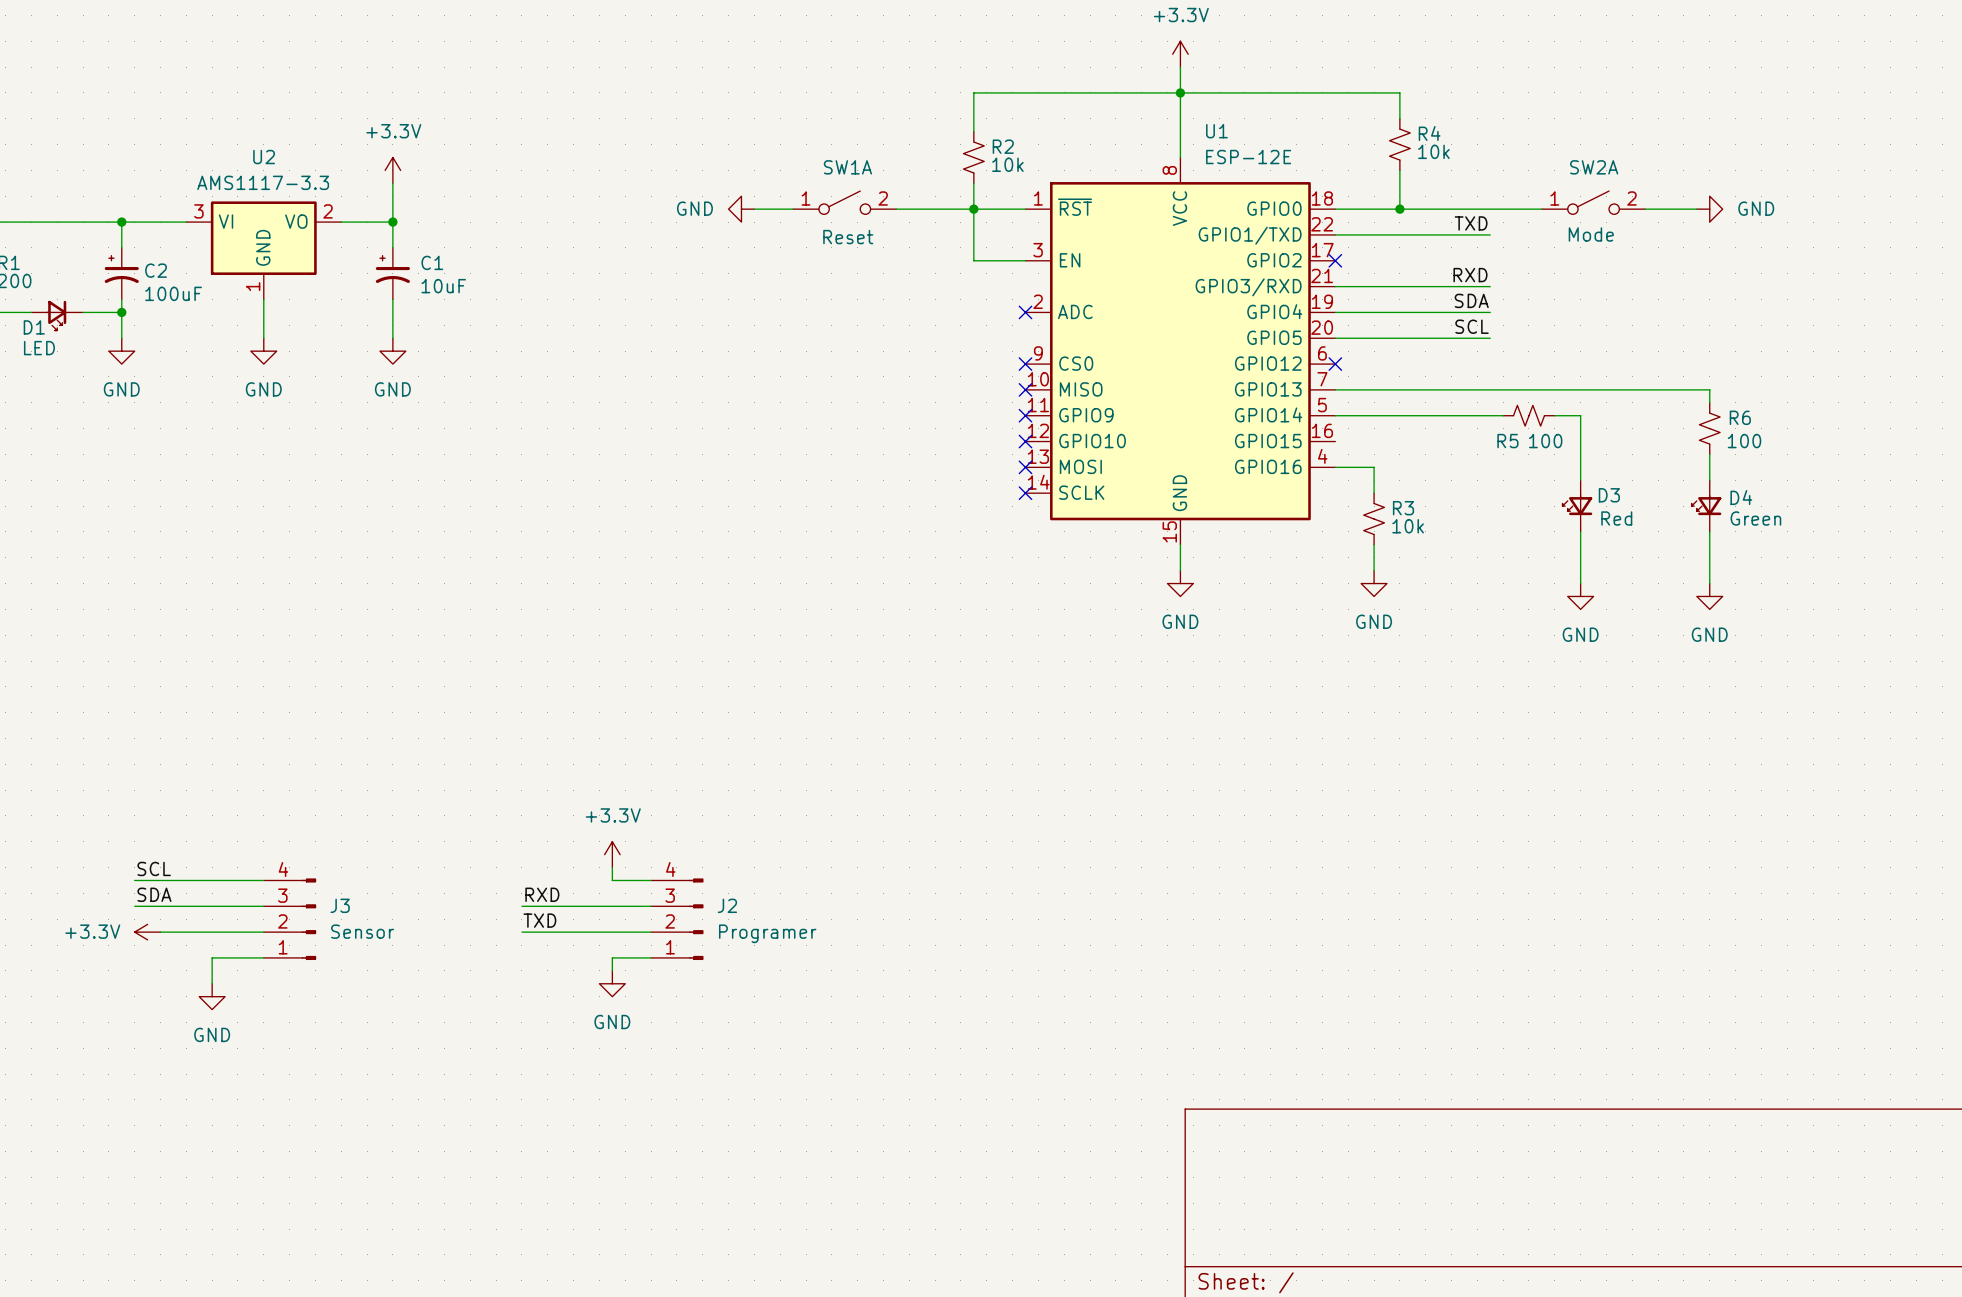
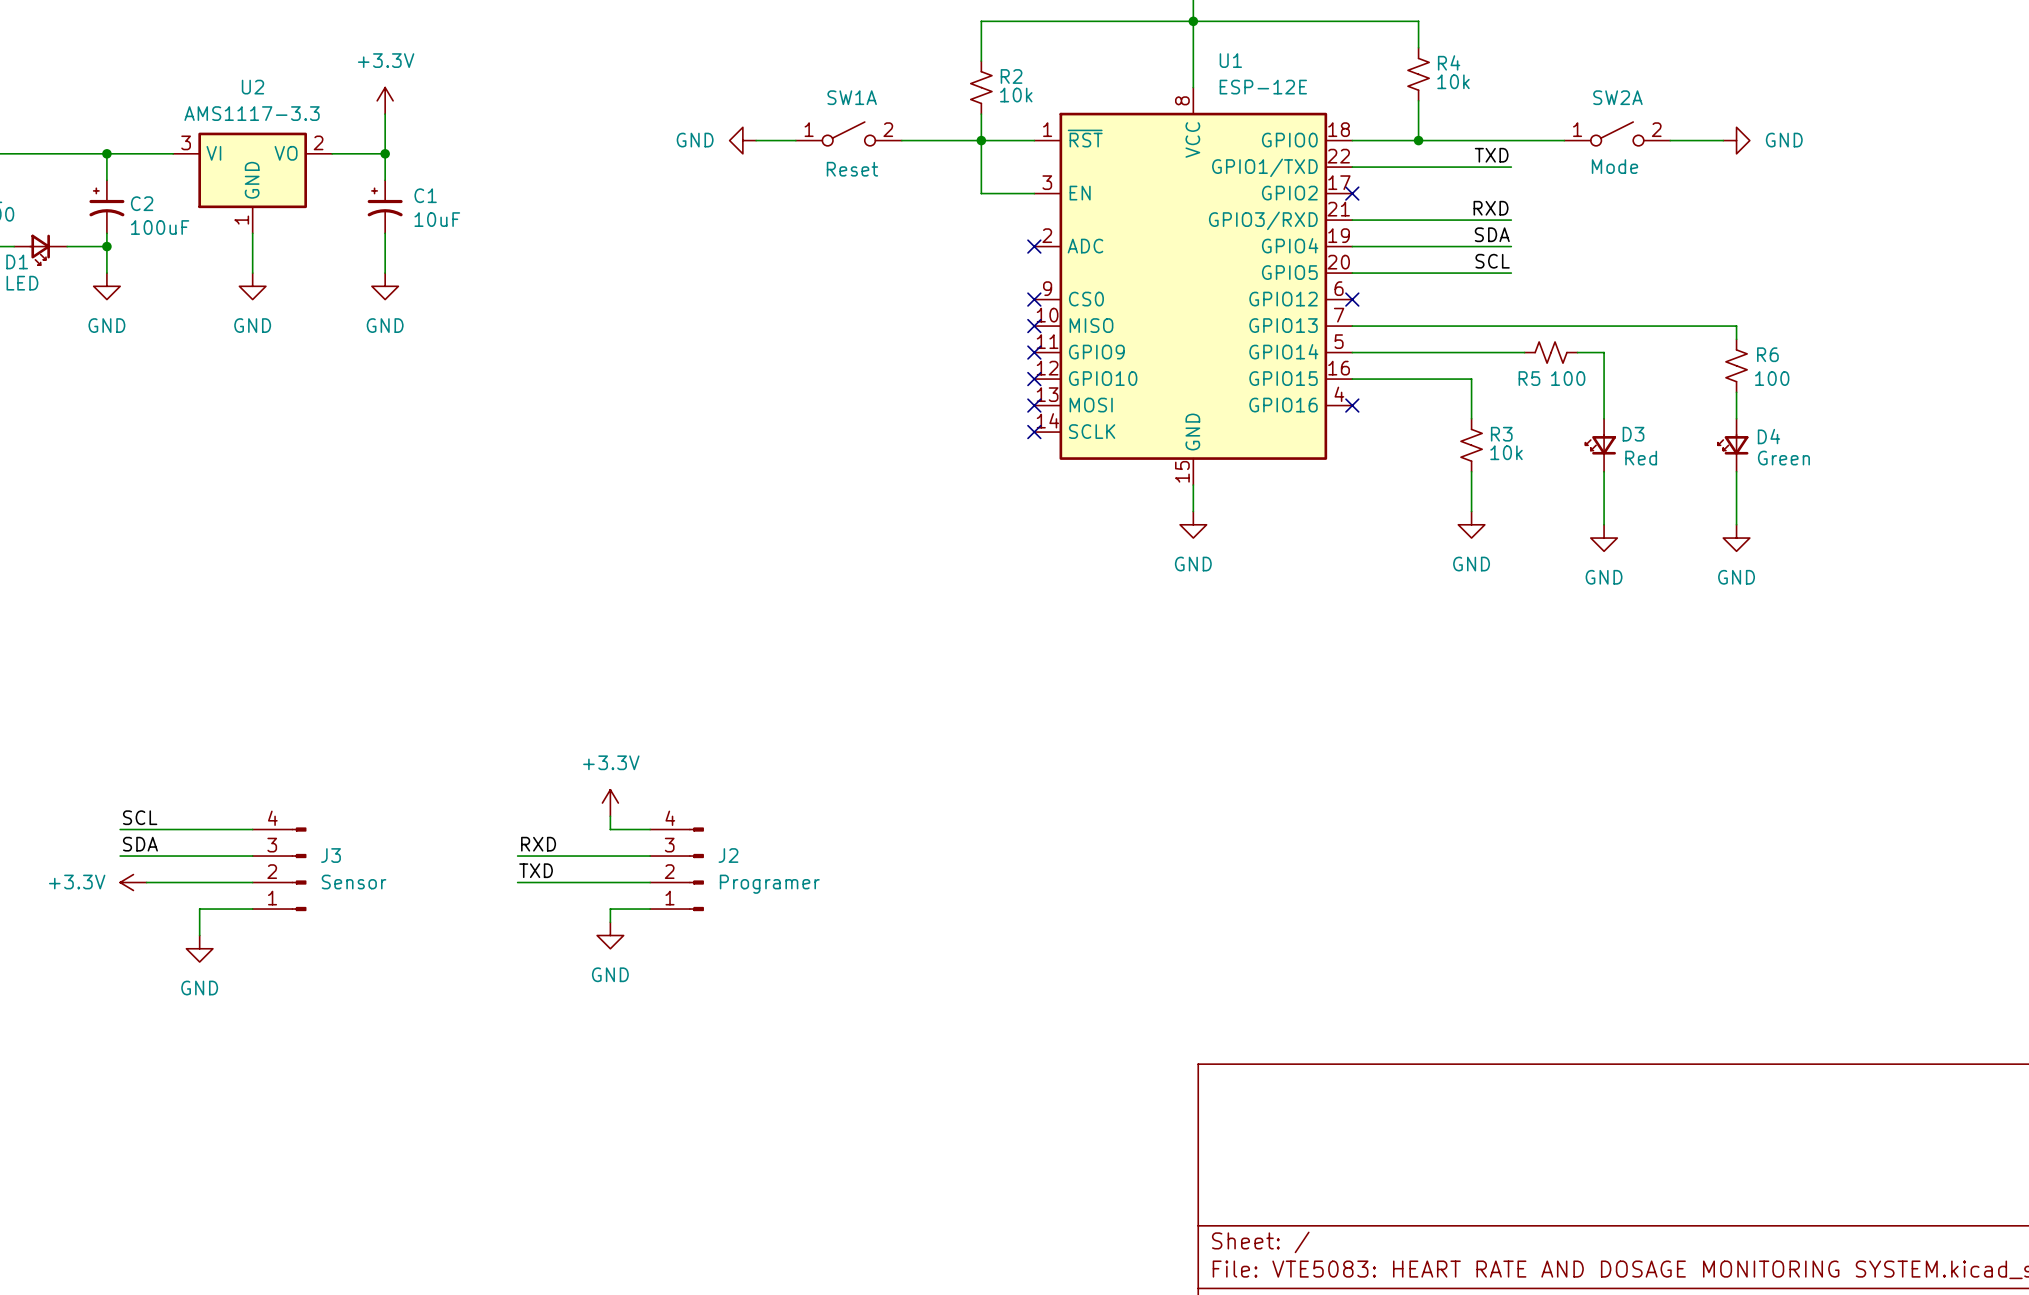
wire: none -> (1352, 379) (1471, 379) (1471, 418)
wire: (1335, 467) (1374, 467) (1374, 493) -> none
no-connect mark: none -> (1352, 405)
R3 position: (1374, 519) -> (1471, 445)
wire: none -> (1471, 471) (1471, 511)
wire: (1374, 544) (1374, 570) -> none
power symbol position: GND (1374, 583) -> GND (1471, 524)

